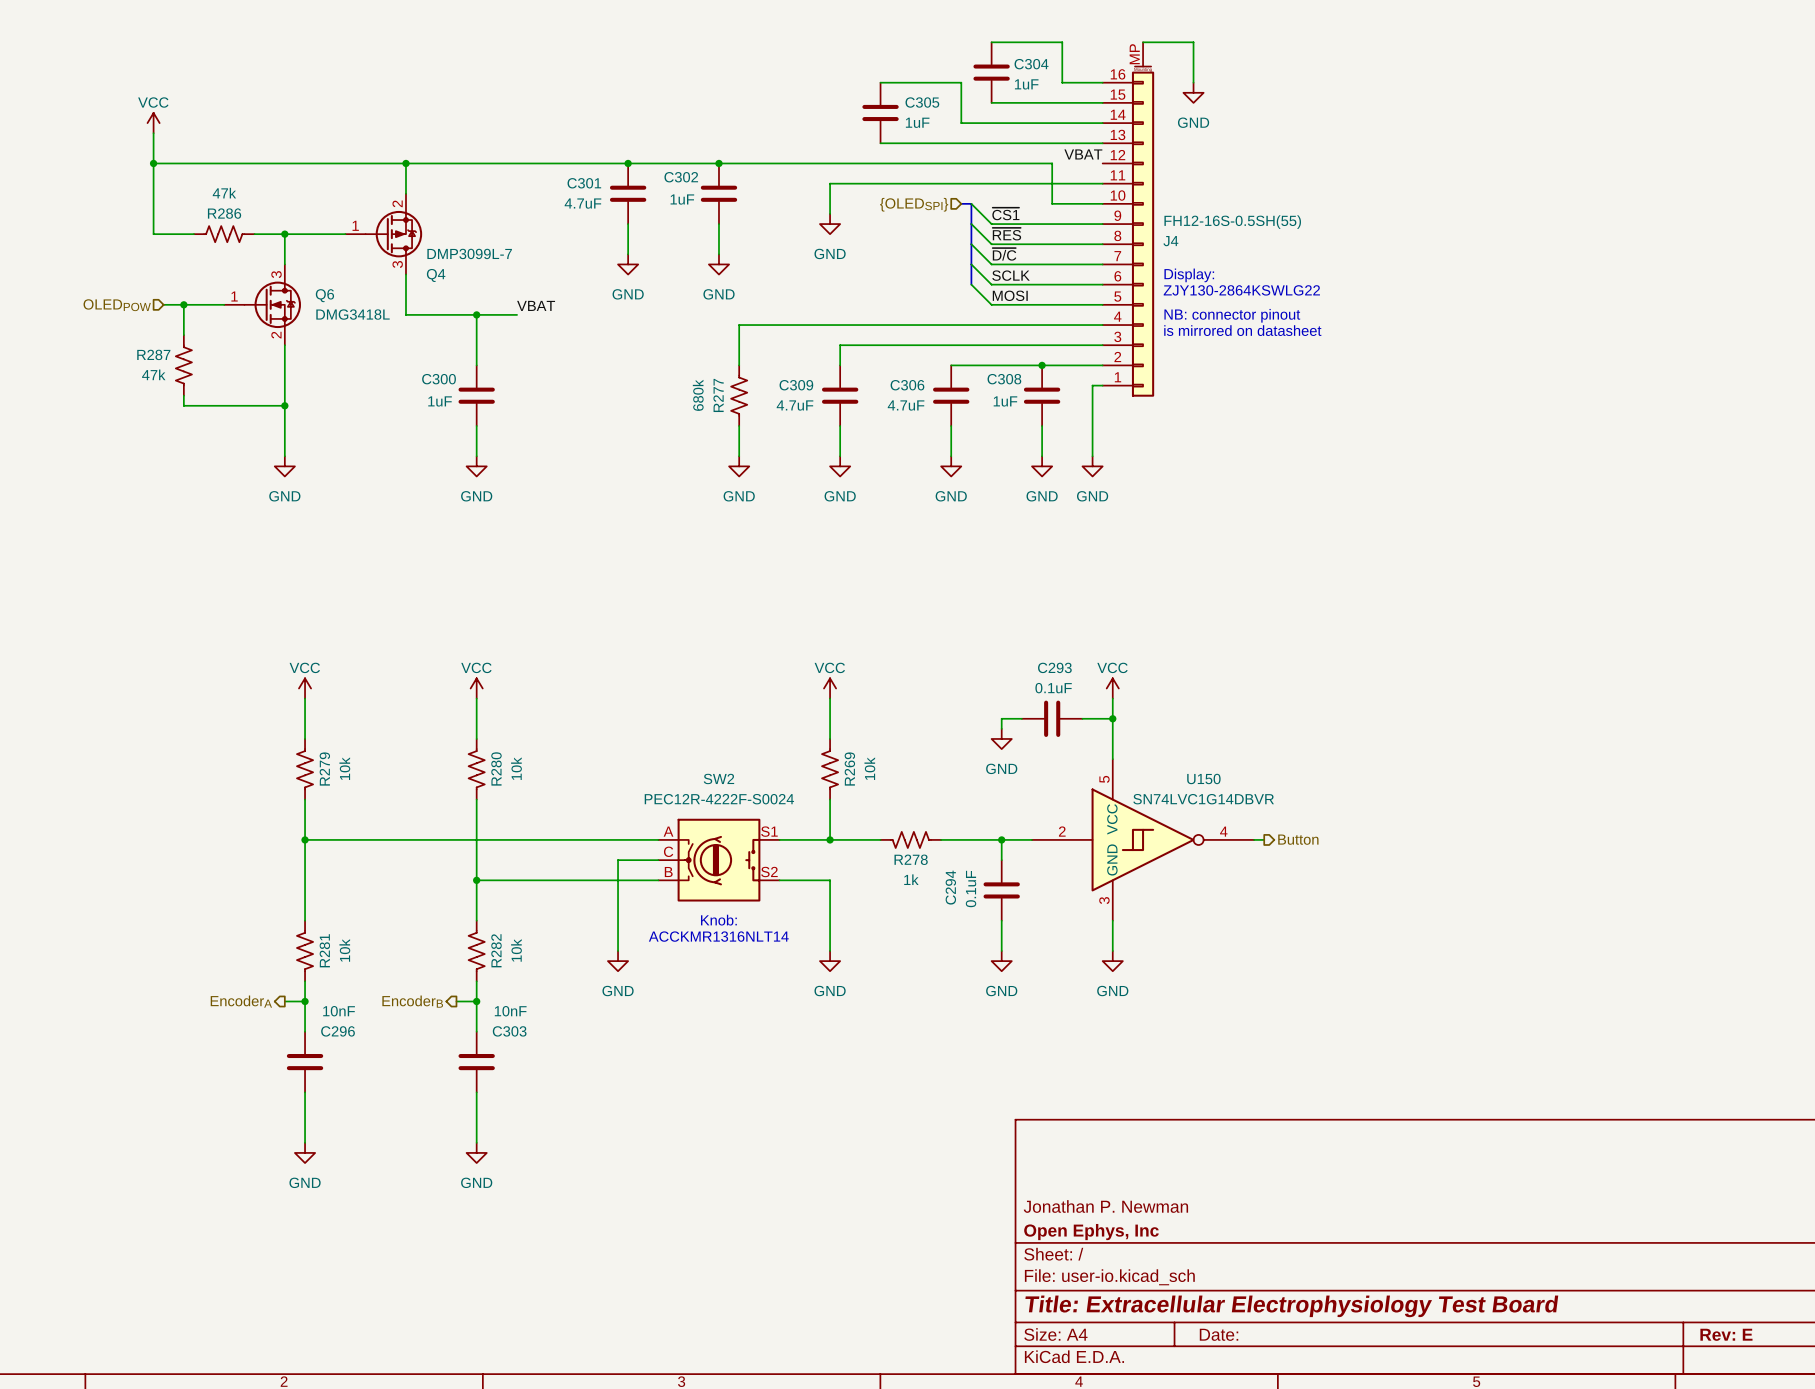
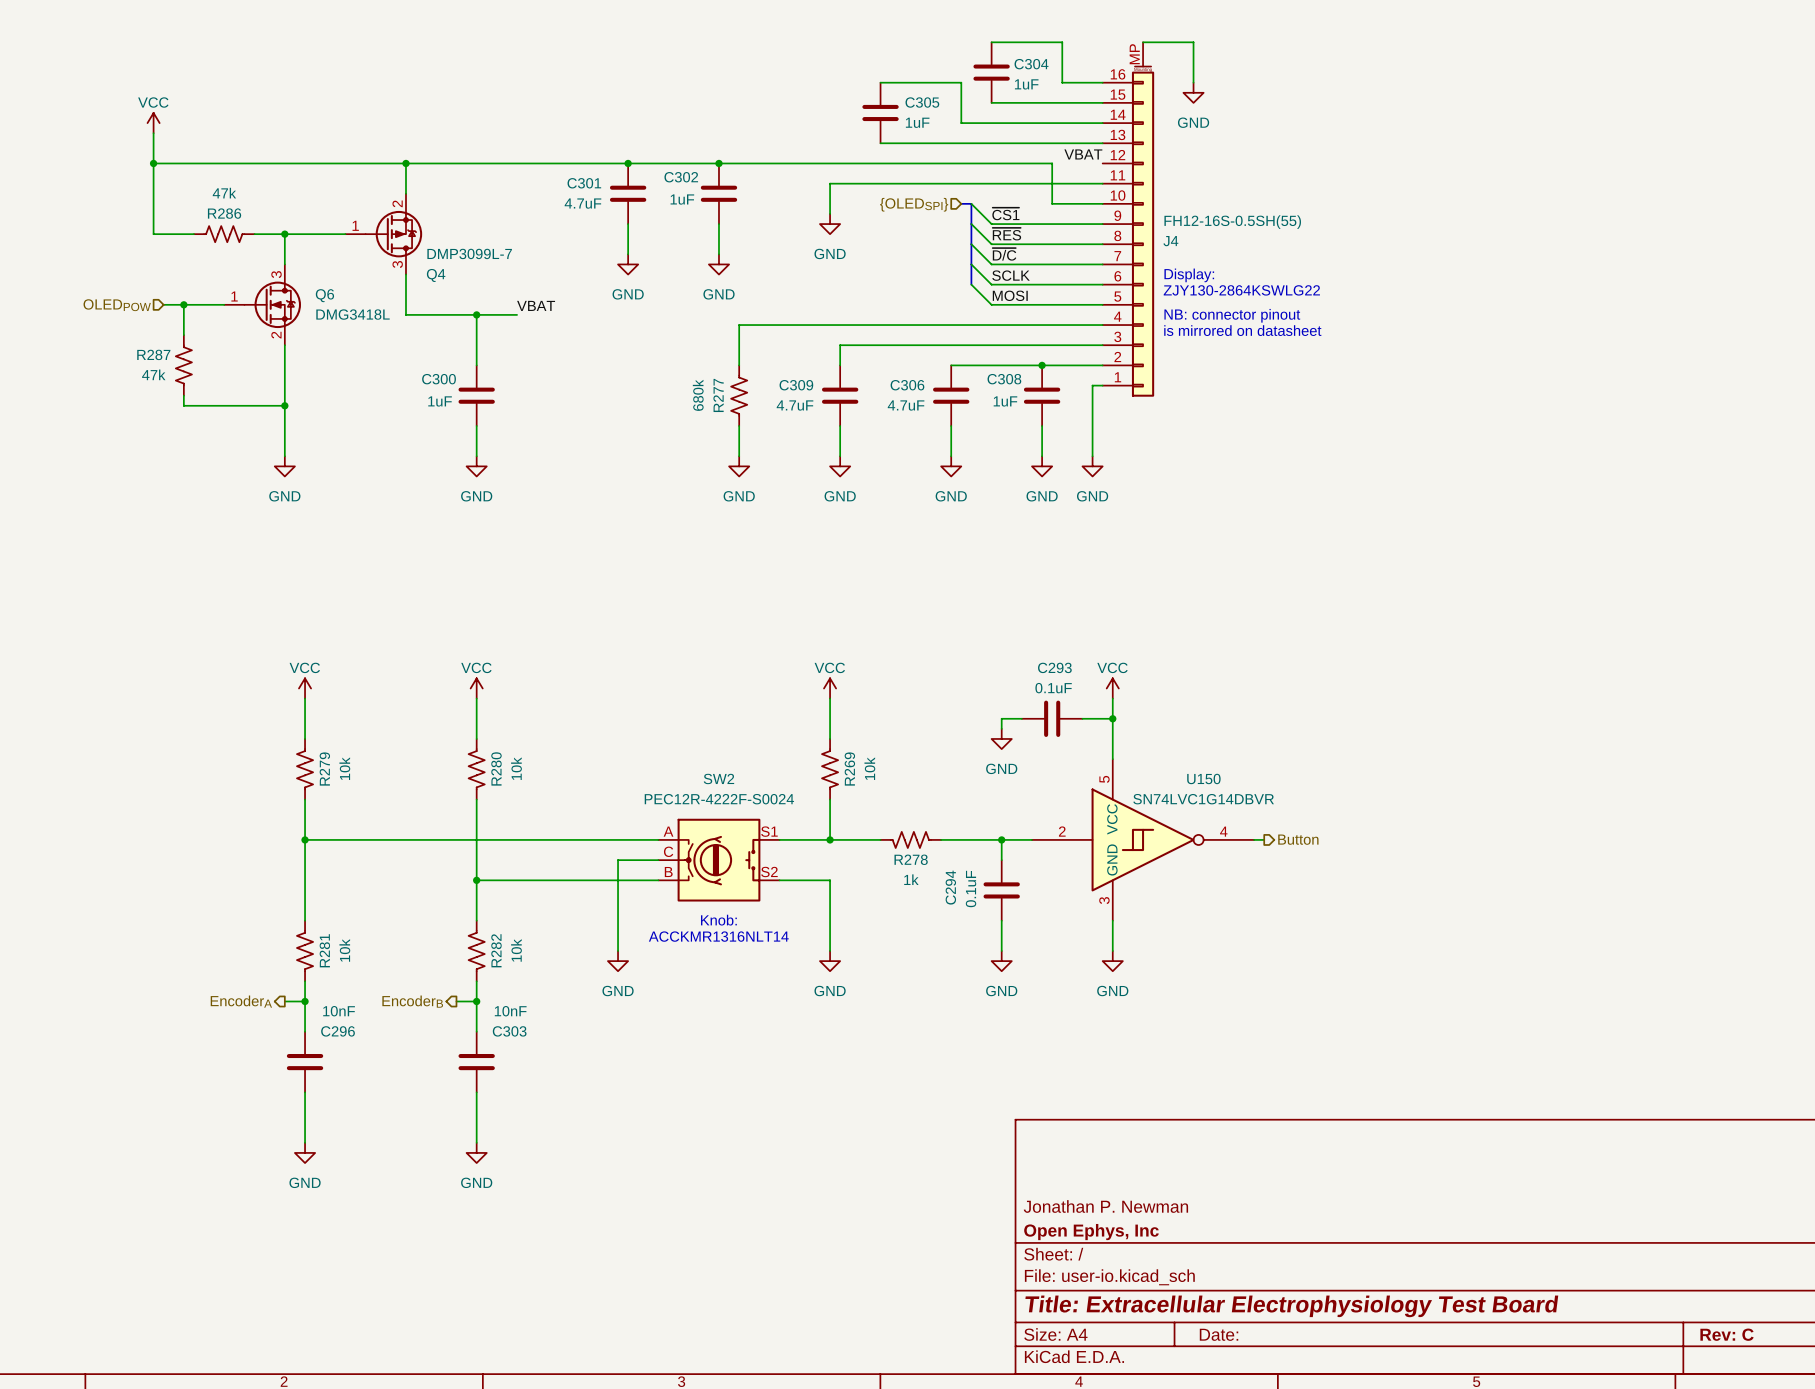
title block: Rev: E (1726, 1334) -> Rev: C (1727, 1334)

